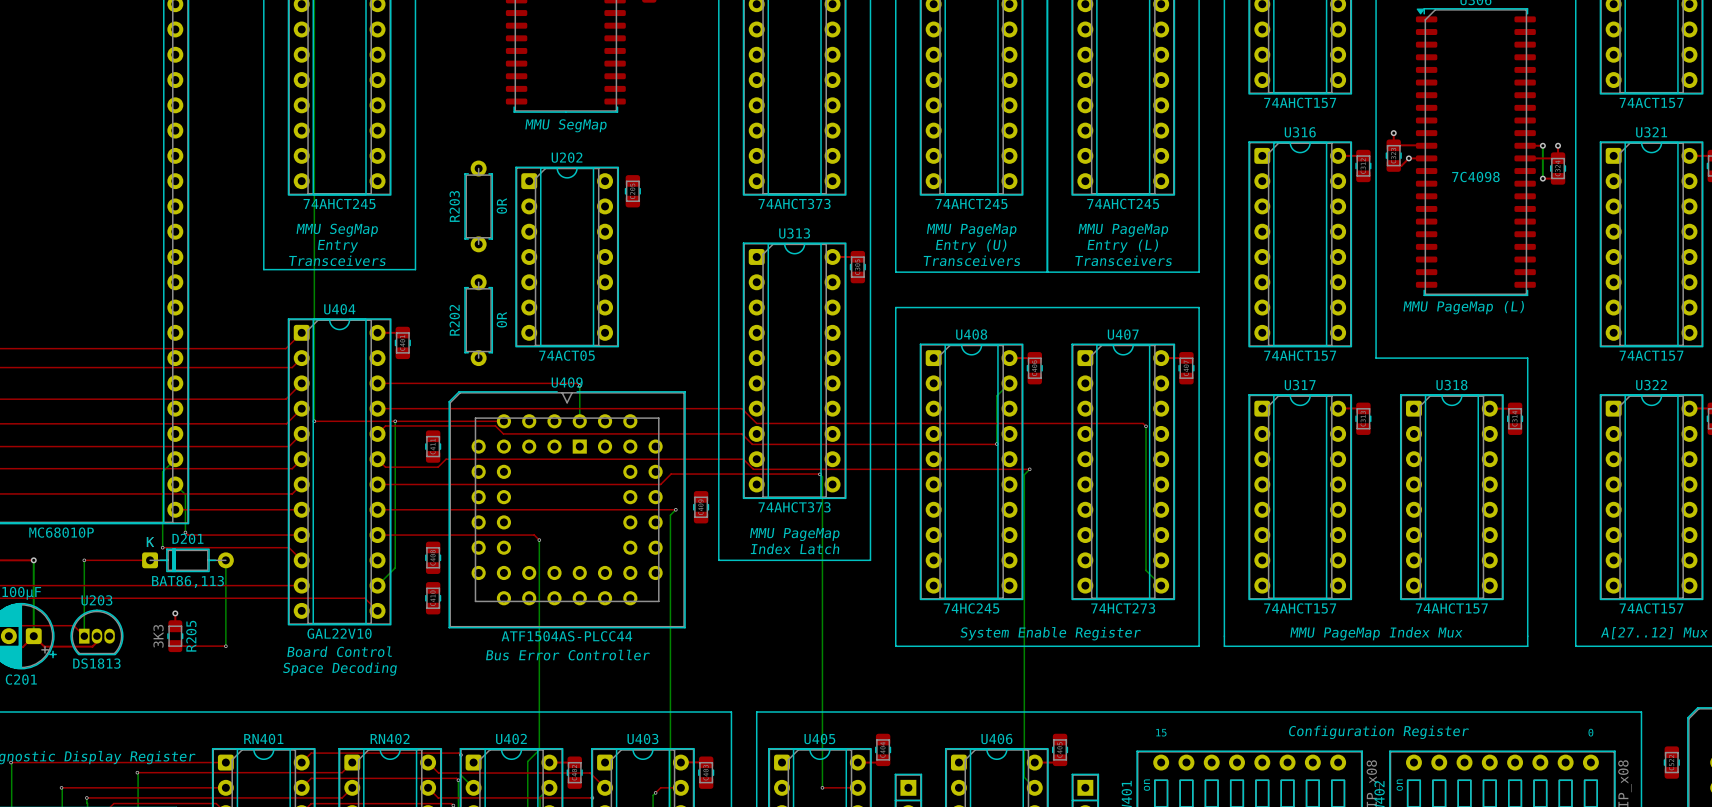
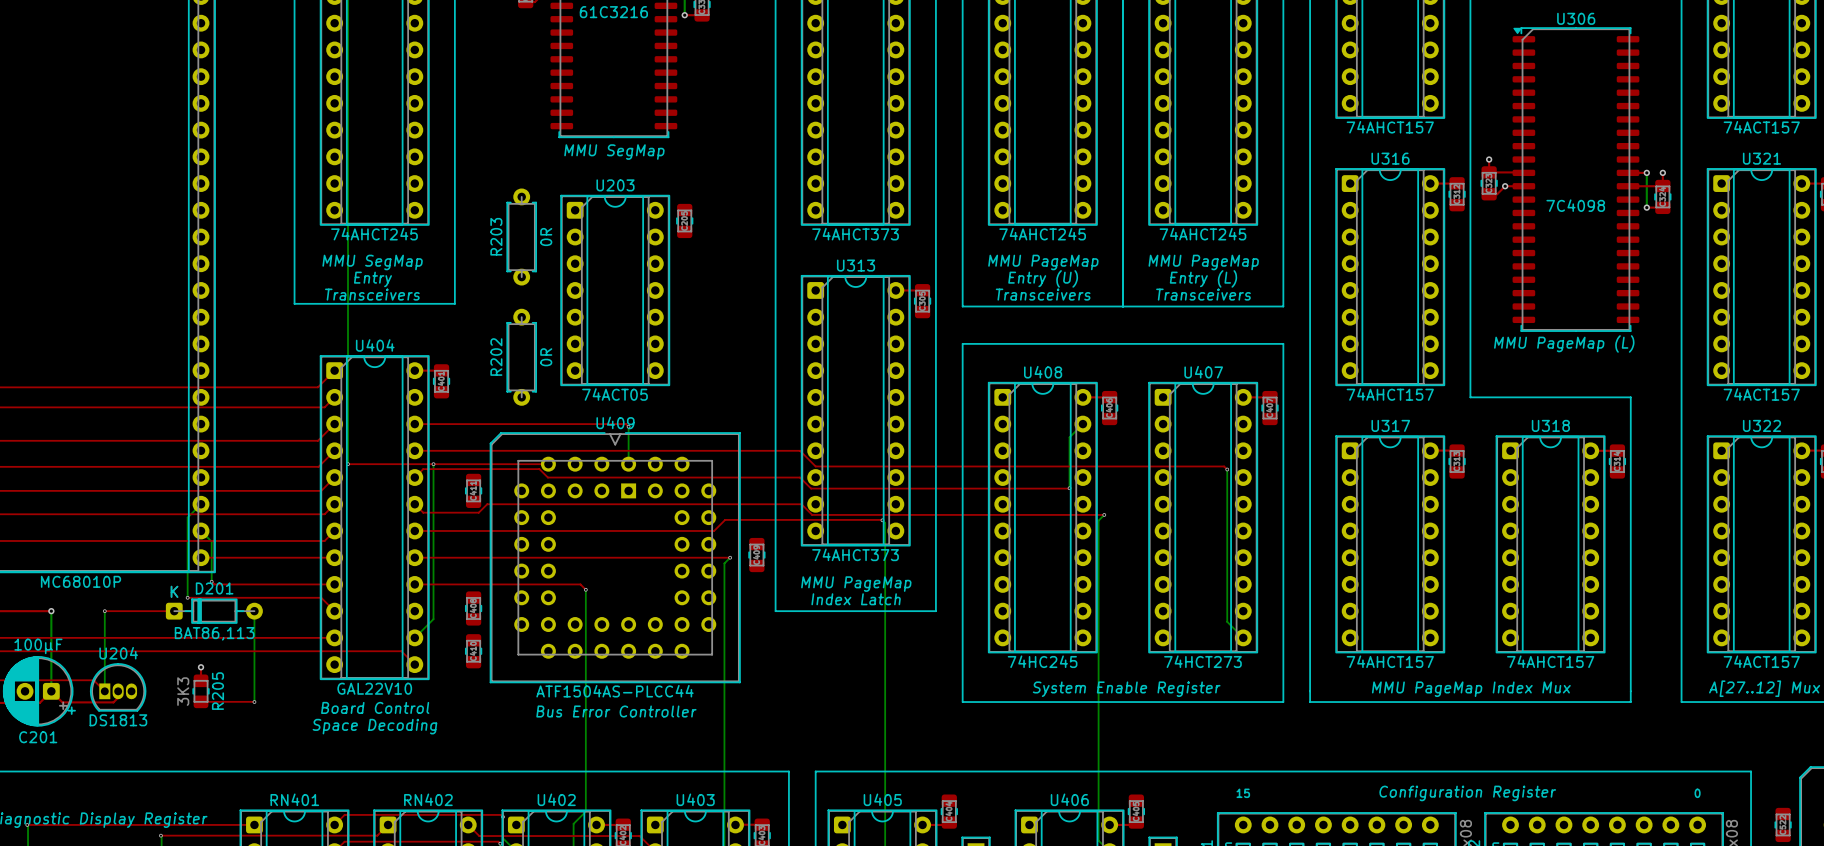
U202 name: U202 (567, 157) -> U203 (615, 185)
U203 name: U203 (96, 600) -> U204 (118, 653)

